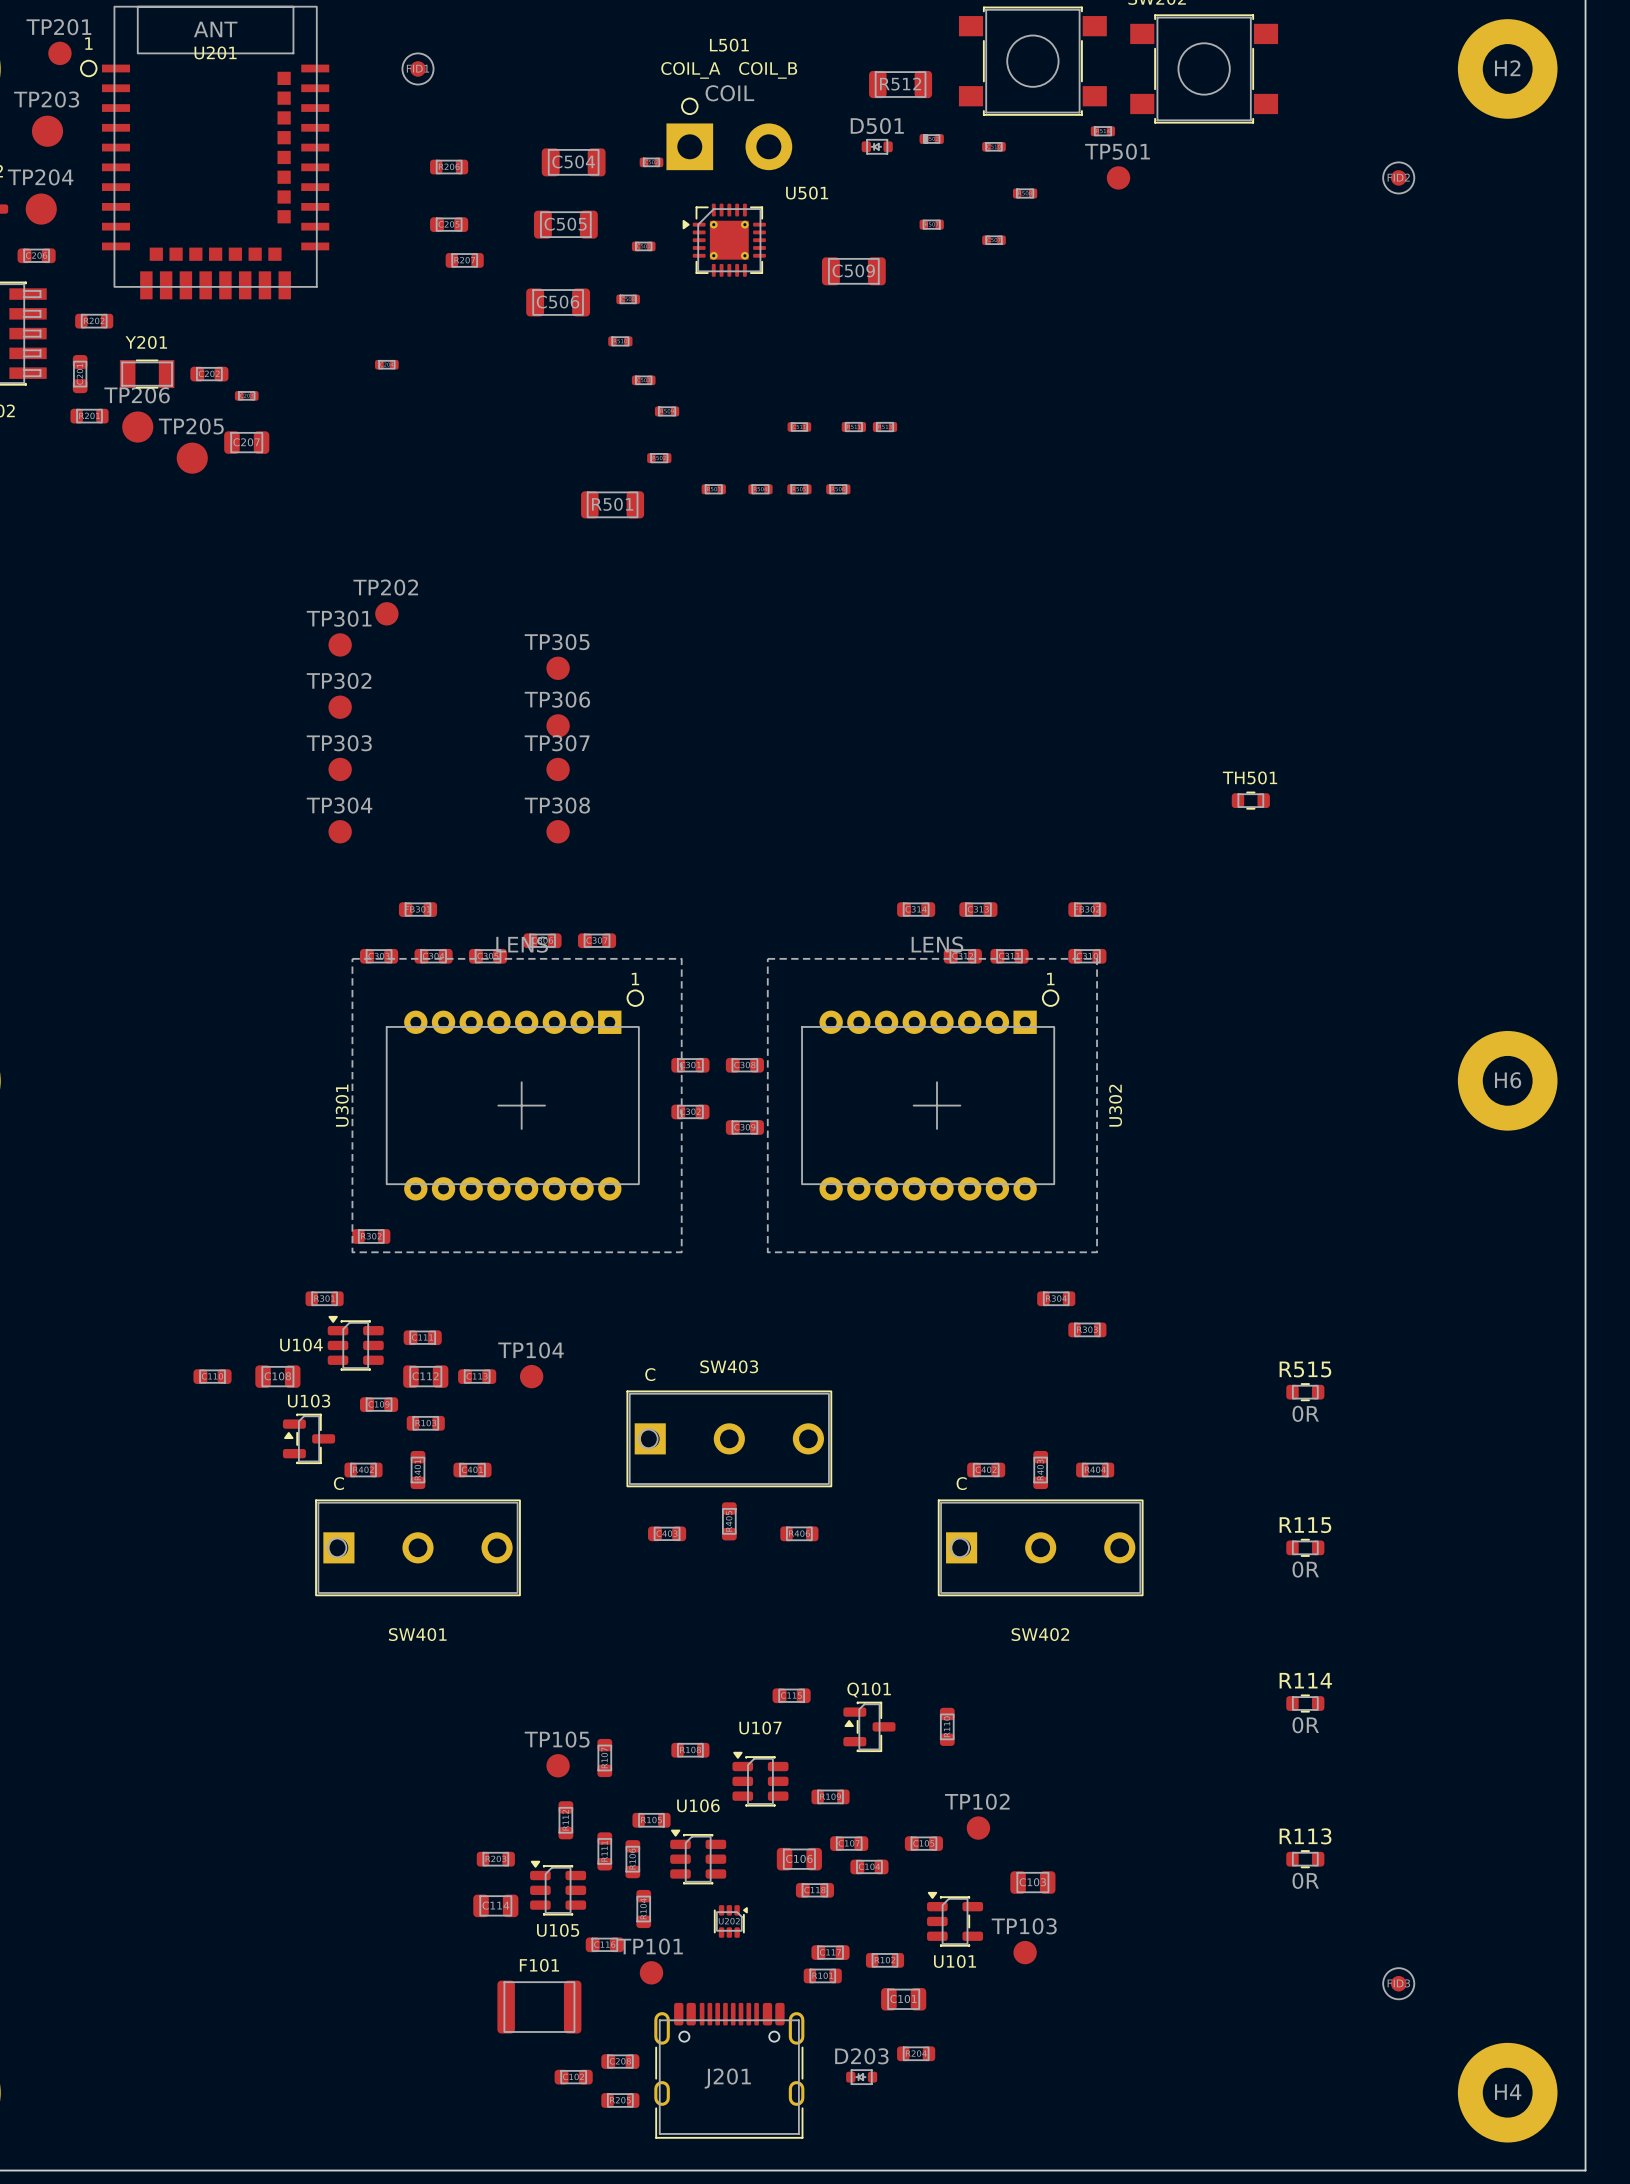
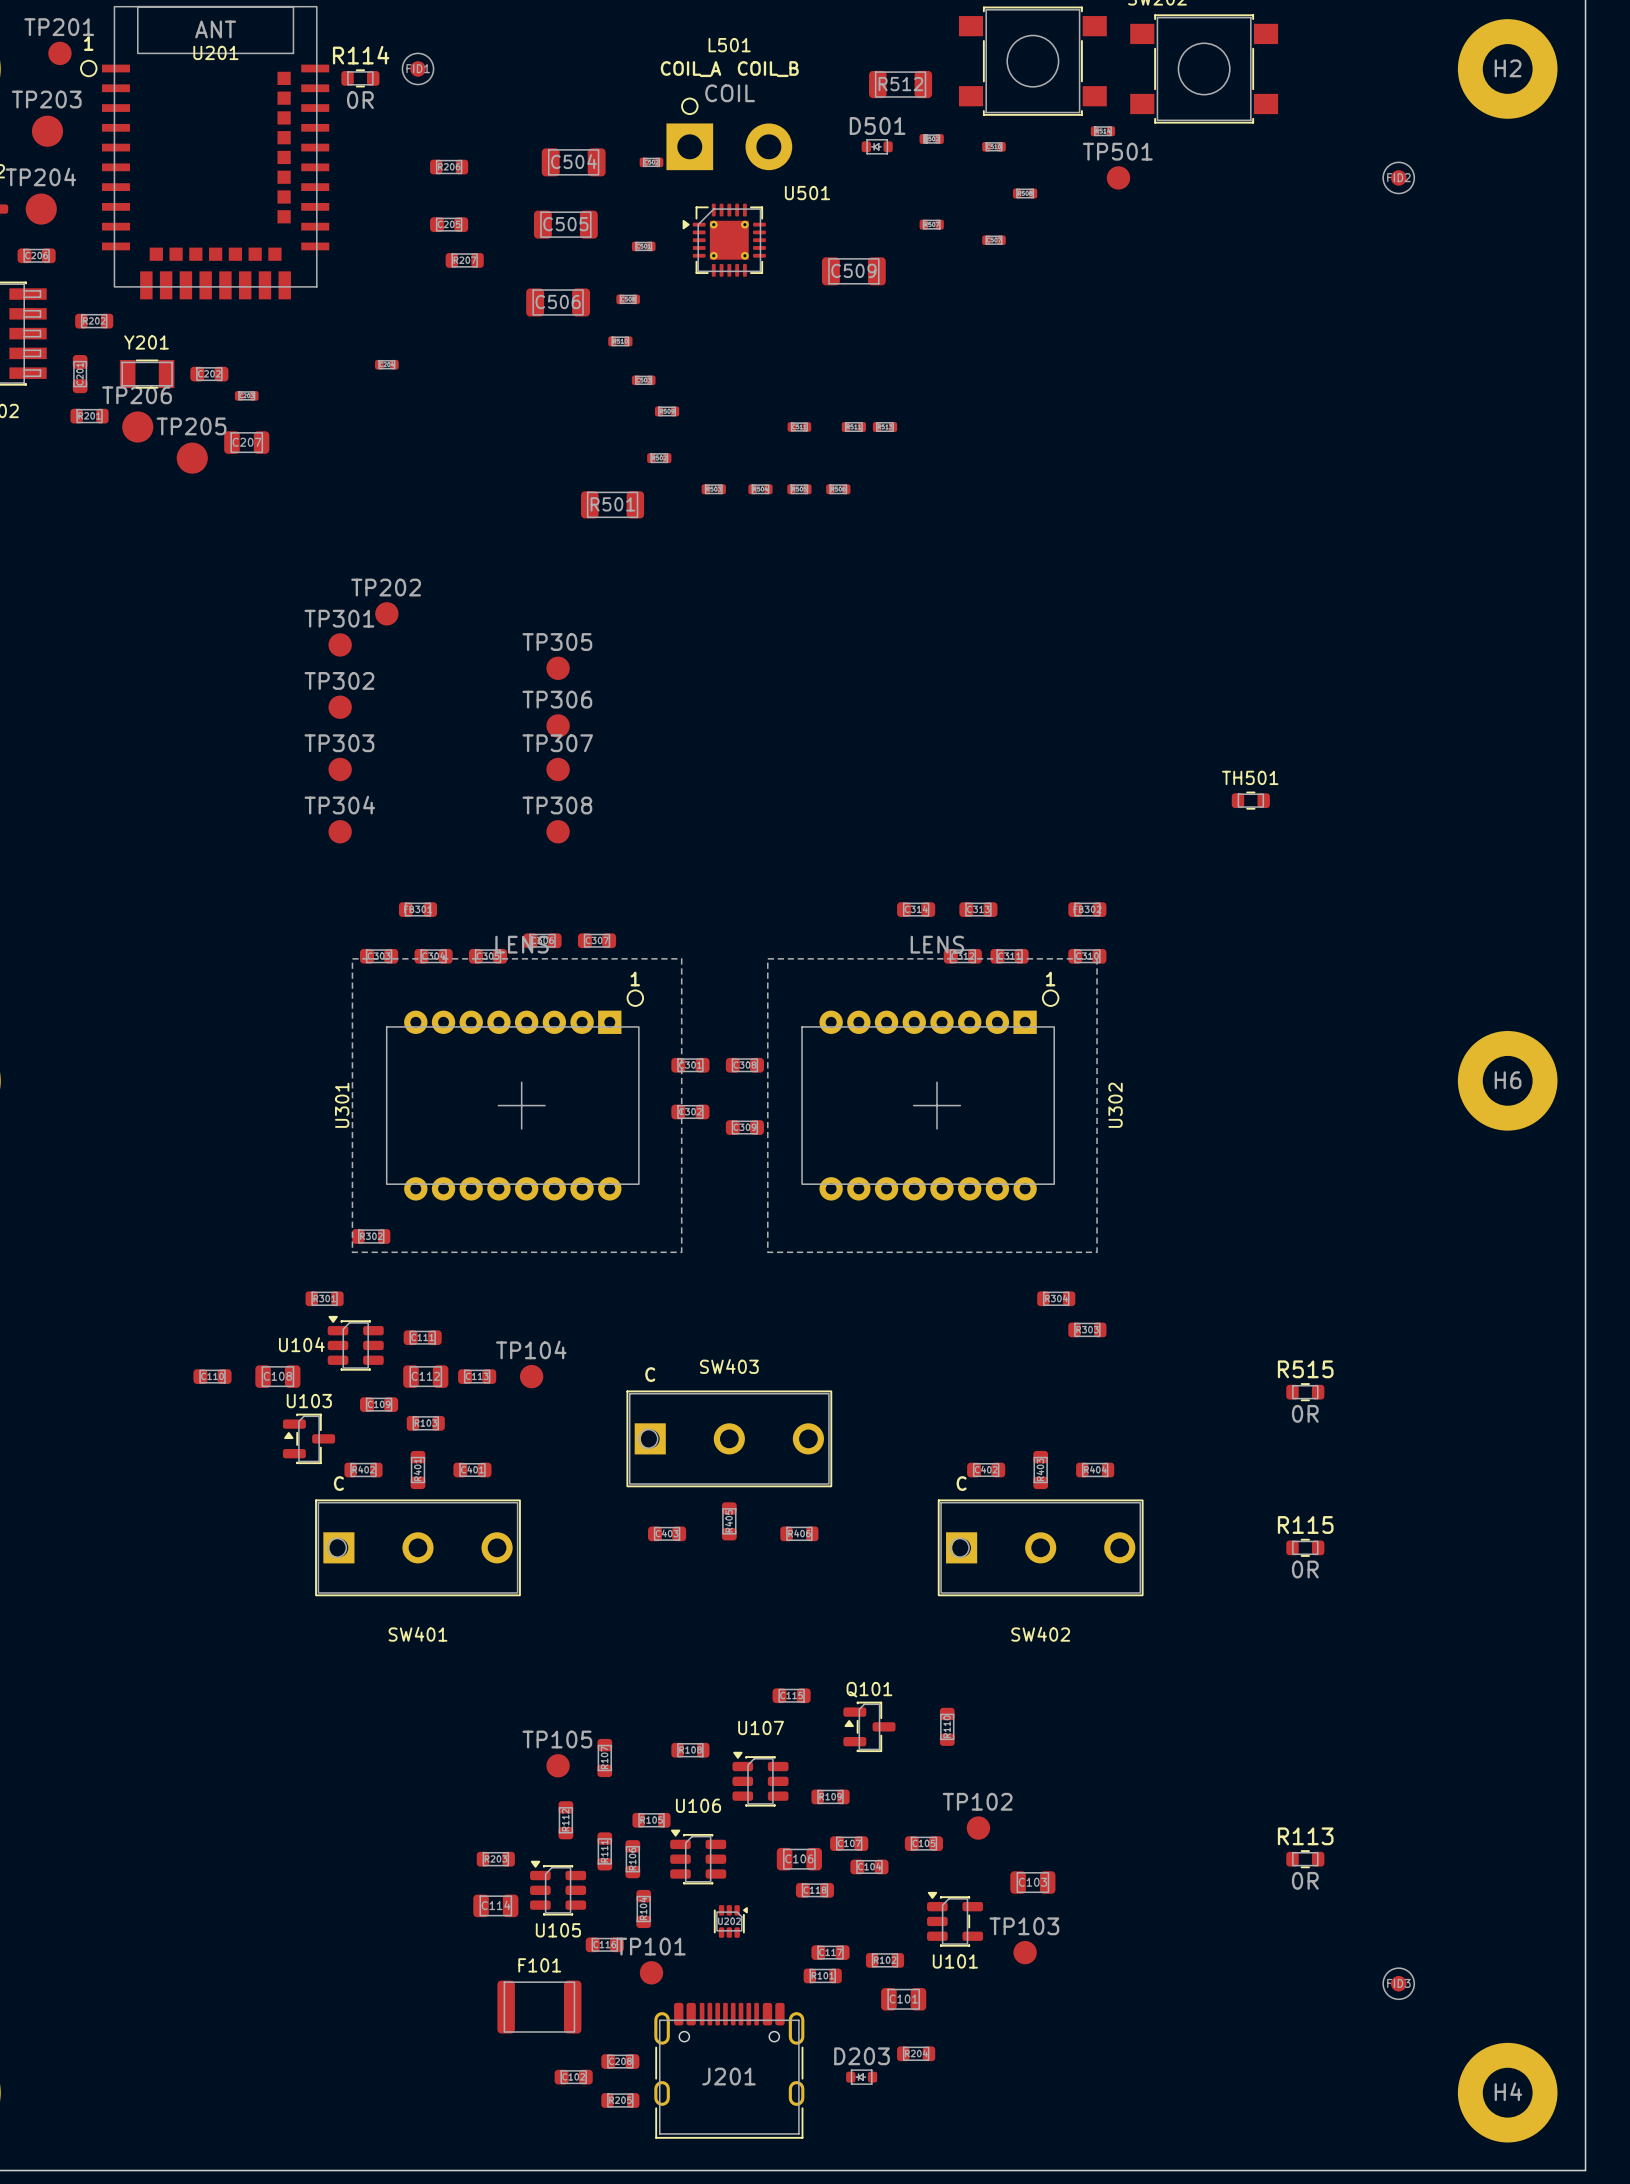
R114 position: (1305, 1703) -> (360, 78)

